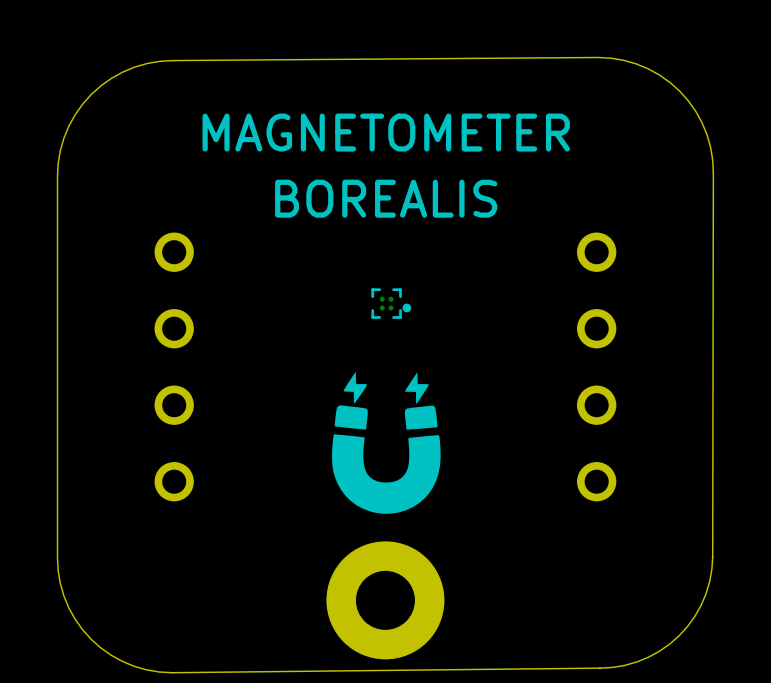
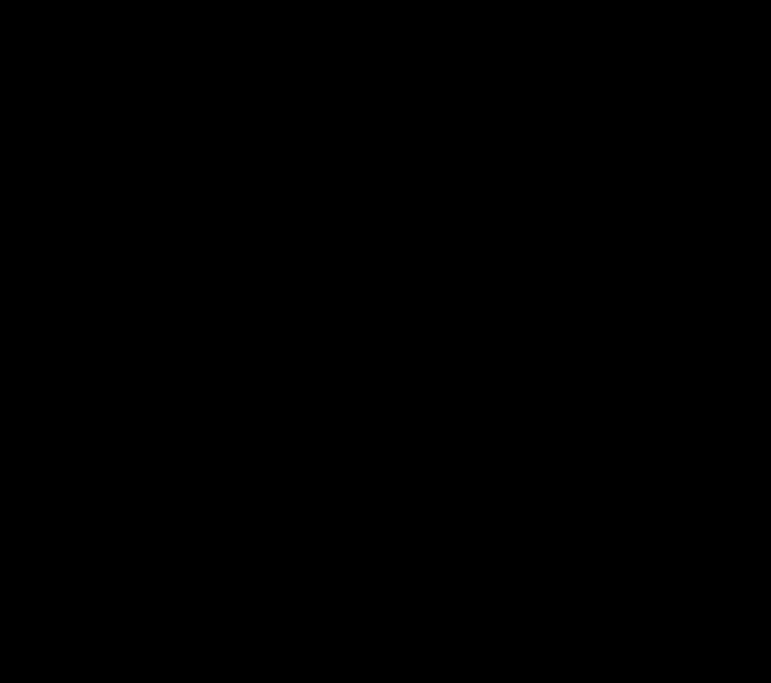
board edge: (598, 57) (160, 61) (122, 72) (101, 85) (82, 104) (63, 137) (57, 176) (57, 558) (60, 583) (68, 607) (82, 629) (100, 647) (134, 666) (172, 672) (599, 668) (624, 665) (648, 657) (669, 644) (687, 626) (706, 593) (712, 556) (712, 159) (701, 122) (688, 100) (670, 82) (636, 63) (598, 57) -> none
text: MAGNETOMETER (386, 132) -> none
text: BOREALIS (386, 198) -> none
part: (391, 303) -> none
part: (174, 366) -> none
part: (596, 366) -> none
drawing: [332, 371, 441, 514] -> none
part: (385, 600) -> none

